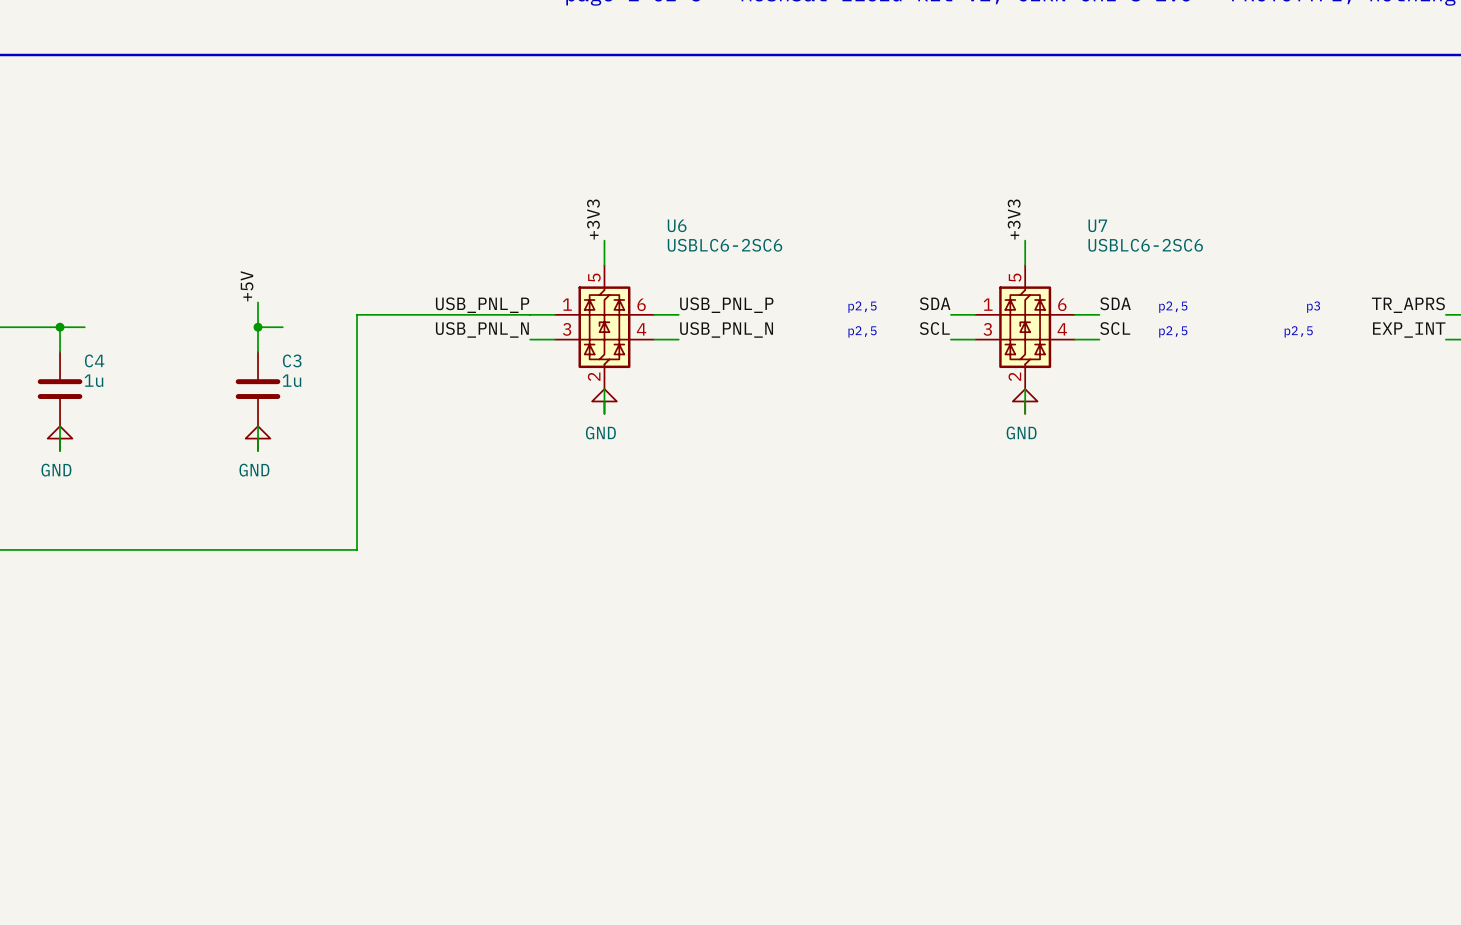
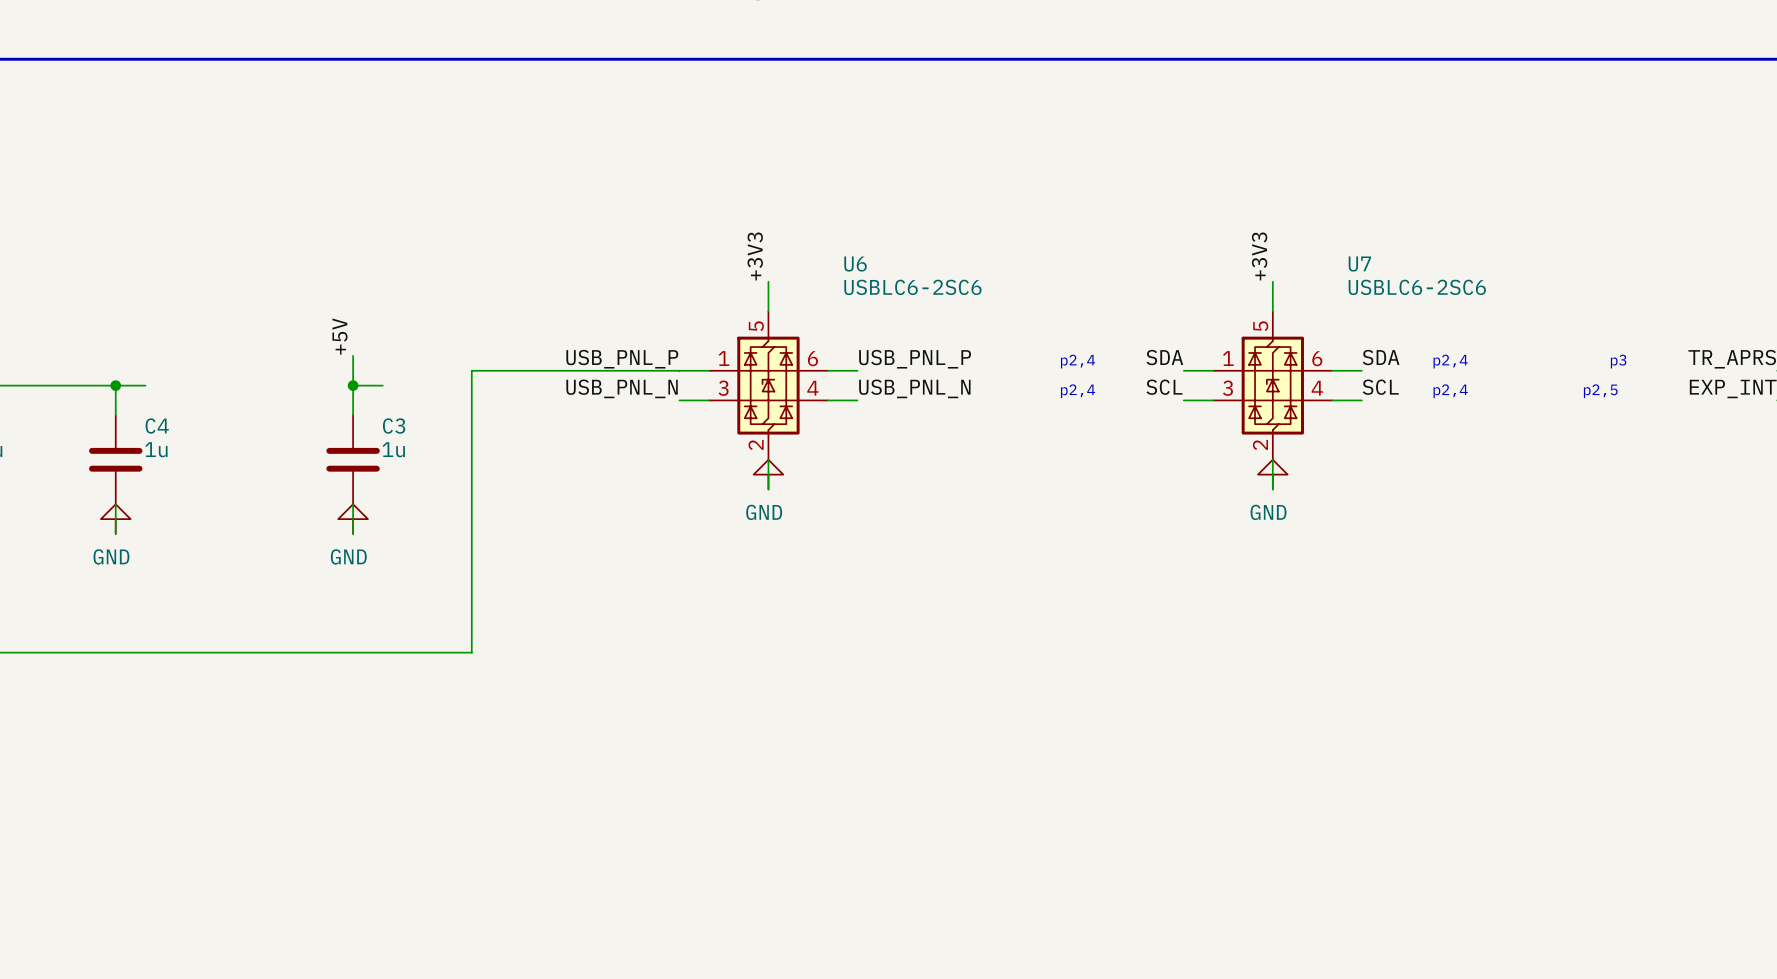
text: p2,5 (862, 307) -> p2,4 (1078, 361)
text: p2,5 (1173, 307) -> p2,4 (1450, 361)
text: p2,5 (862, 331) -> p2,4 (1078, 391)
text: p2,5 (1173, 331) -> p2,4 (1450, 391)

